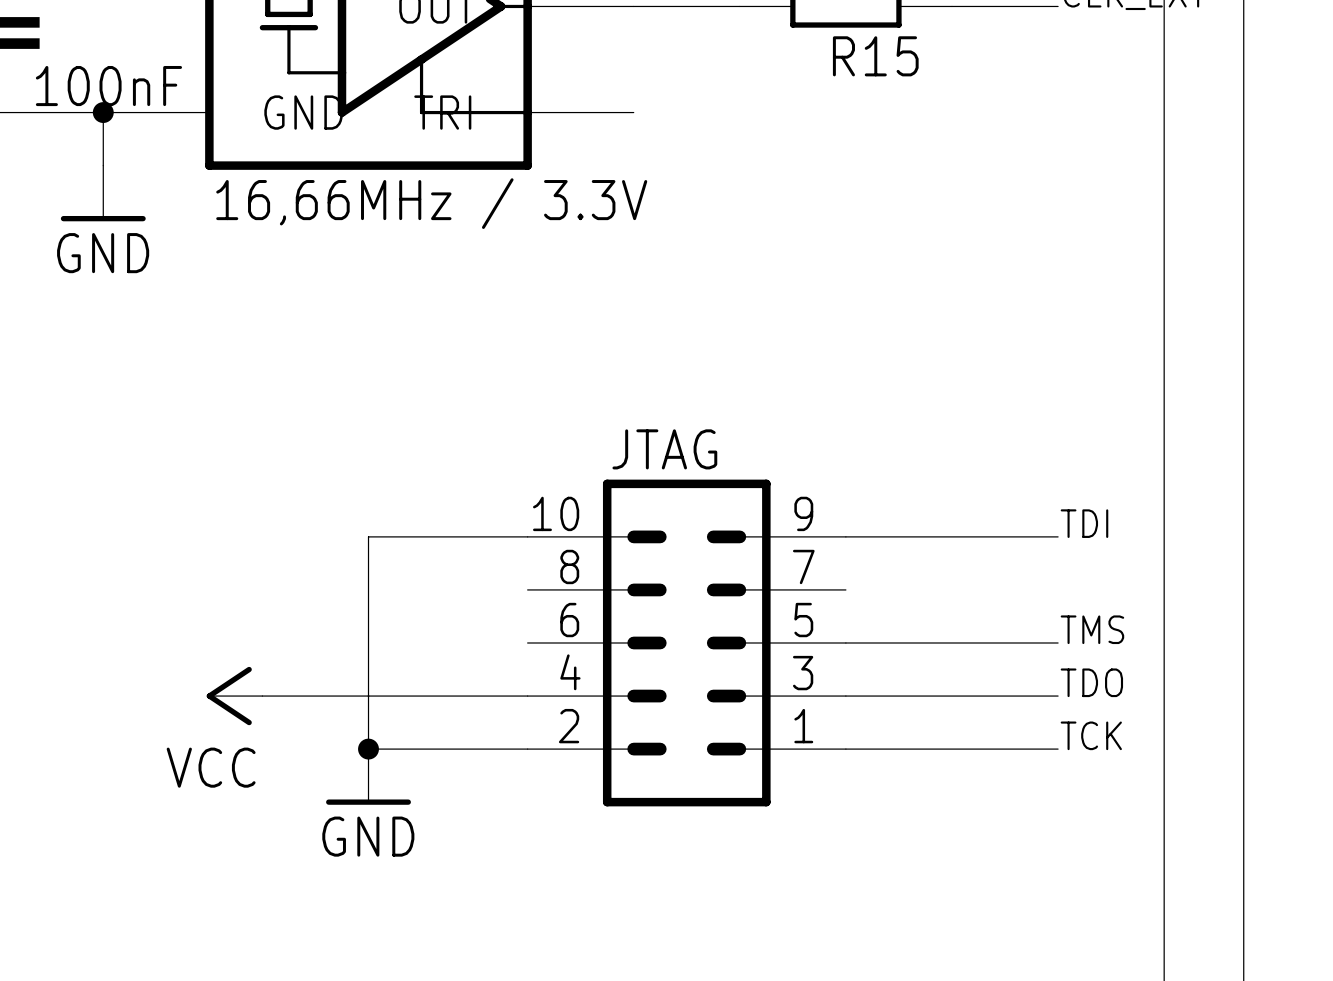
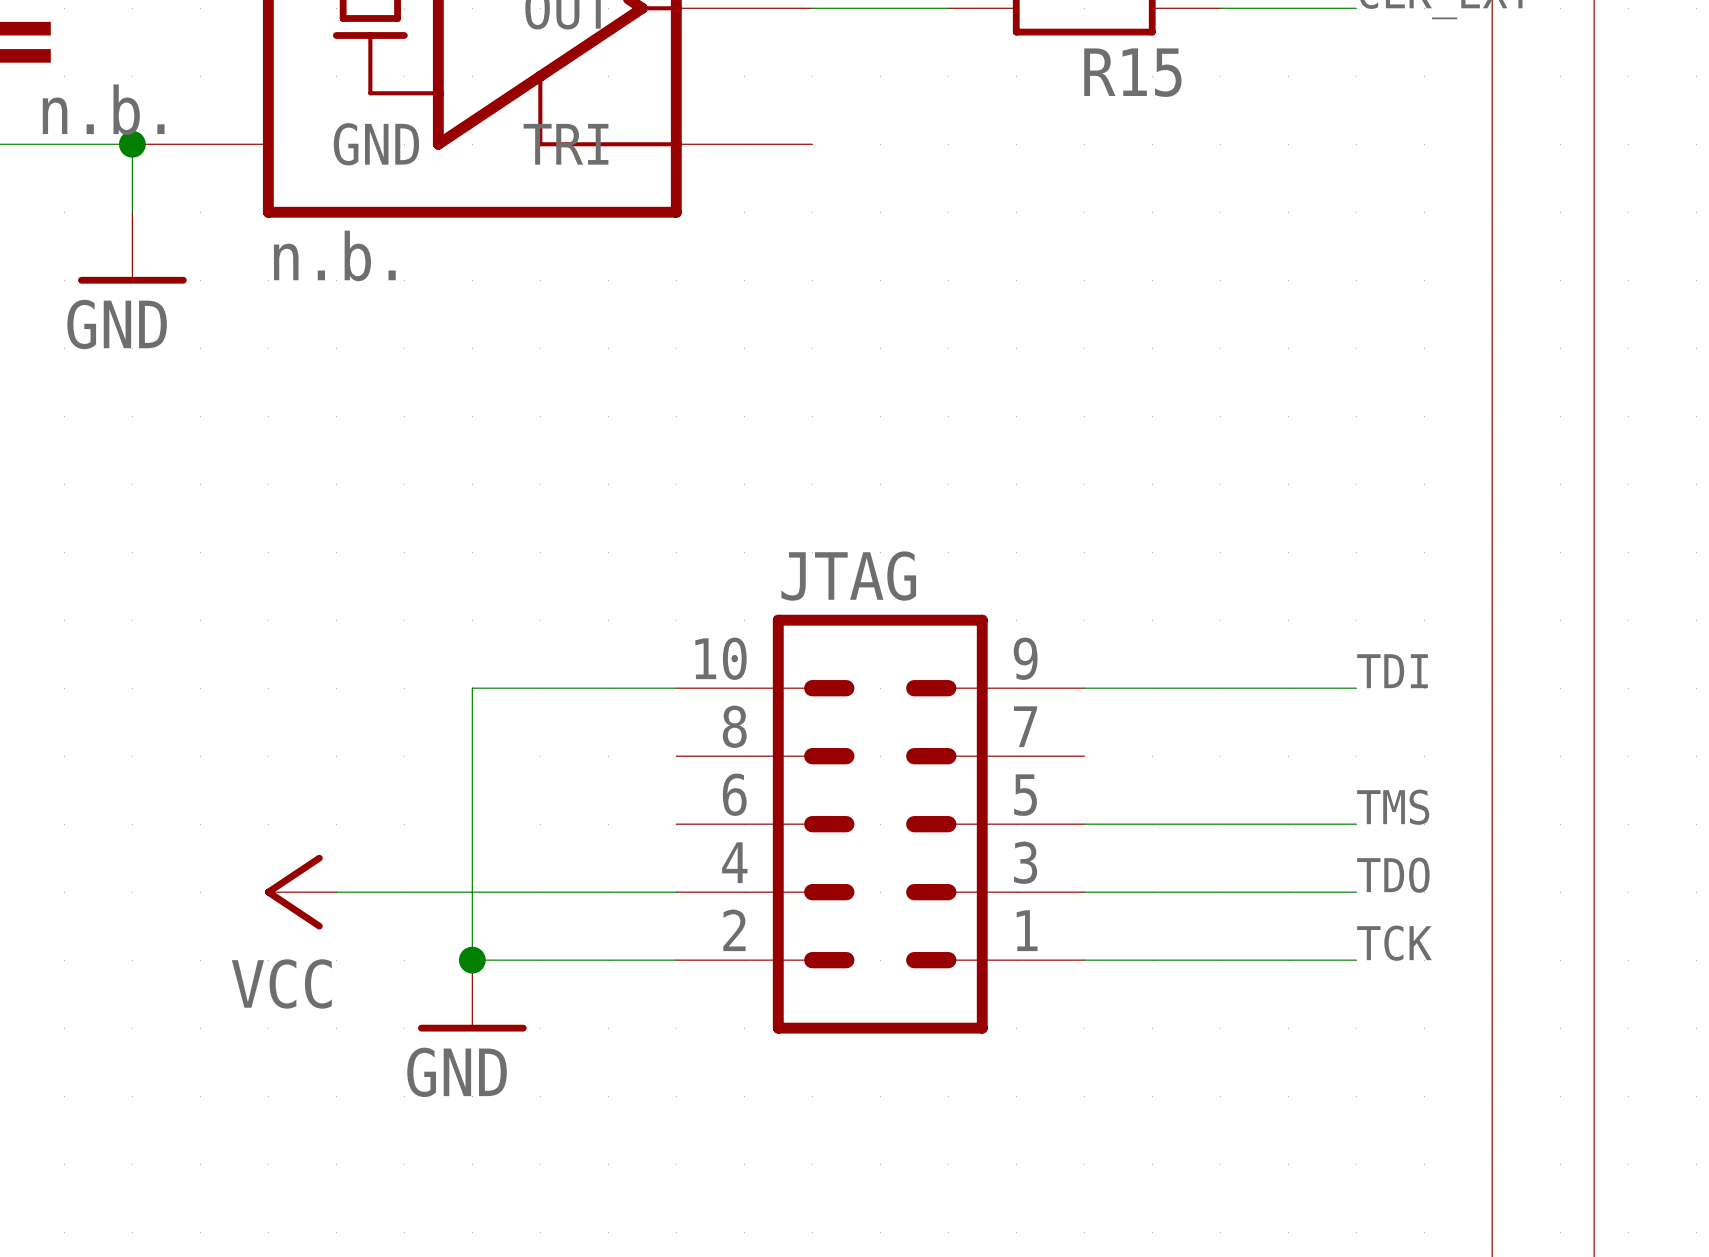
part value: 100nF (108, 86) -> n.b. (103, 109)
part value: 16,66MHz / 3.3V (431, 203) -> n.b. (334, 255)

